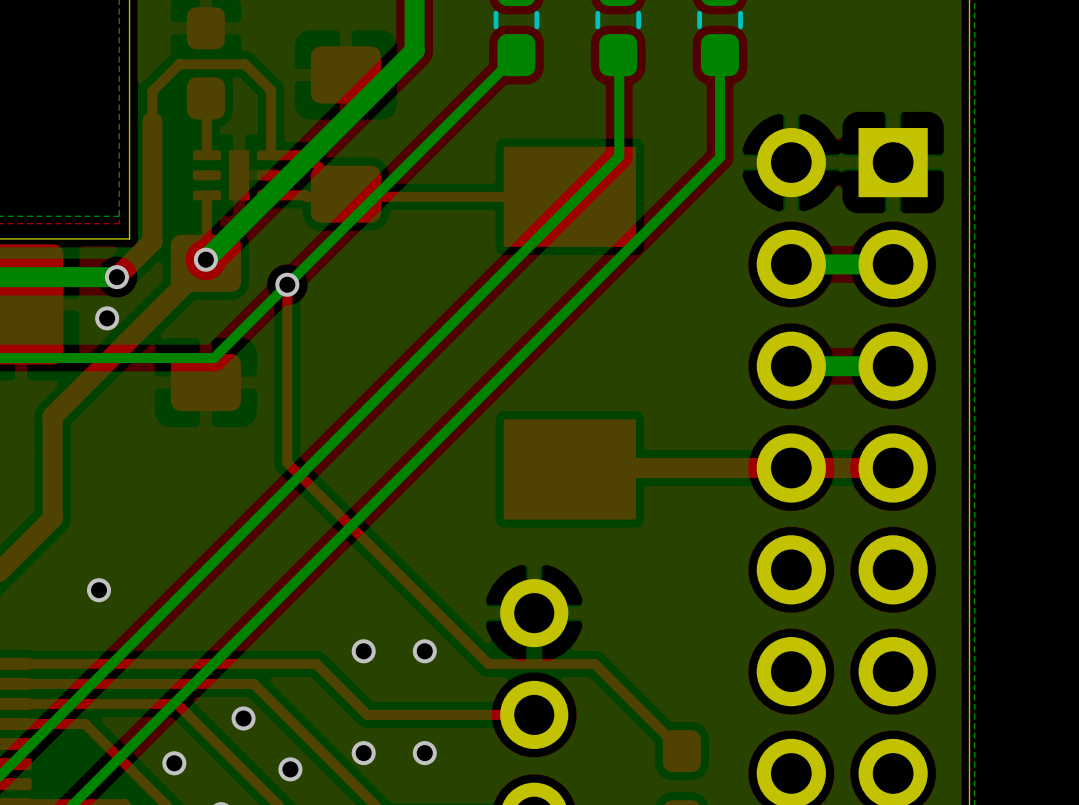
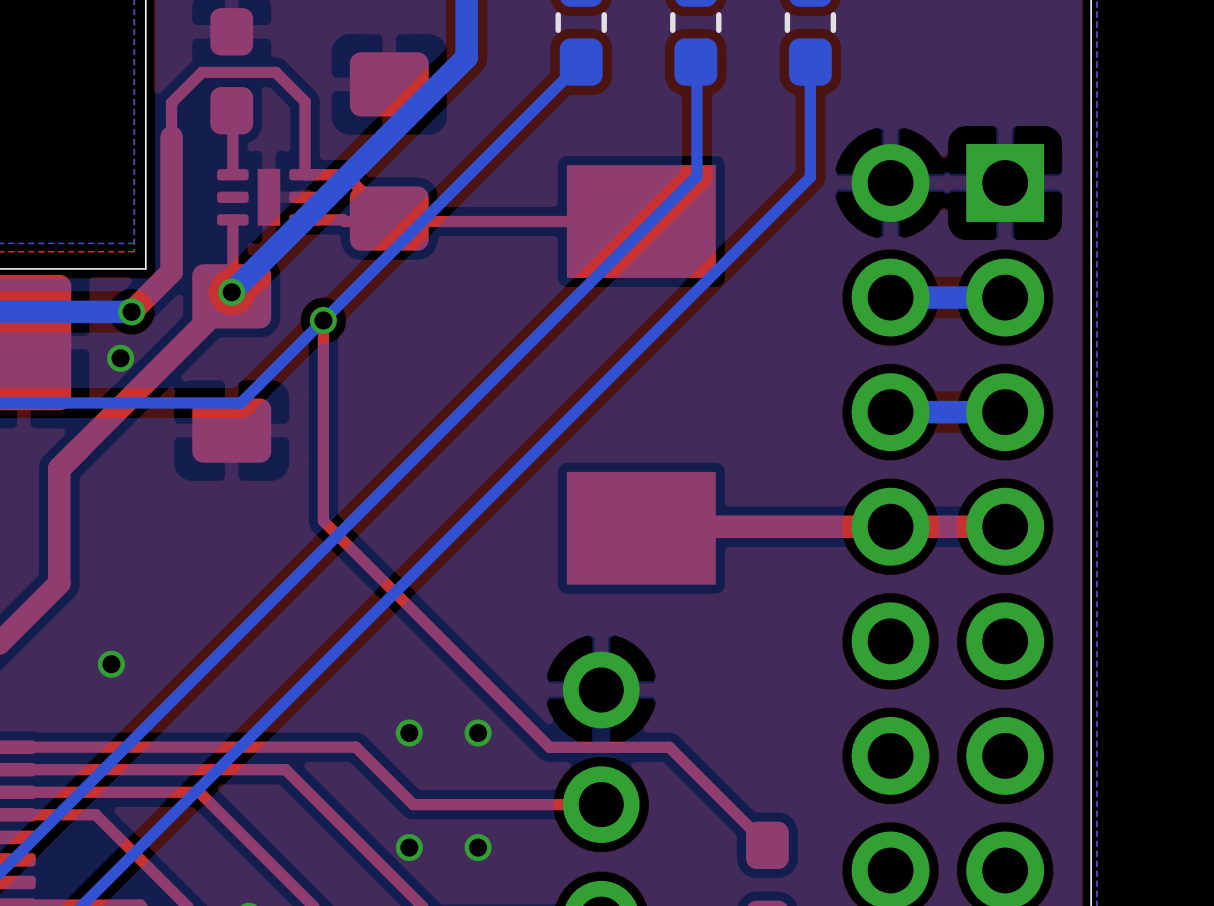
via: (243, 718) -> none
via: (174, 763) -> none
via: (290, 769) -> none

